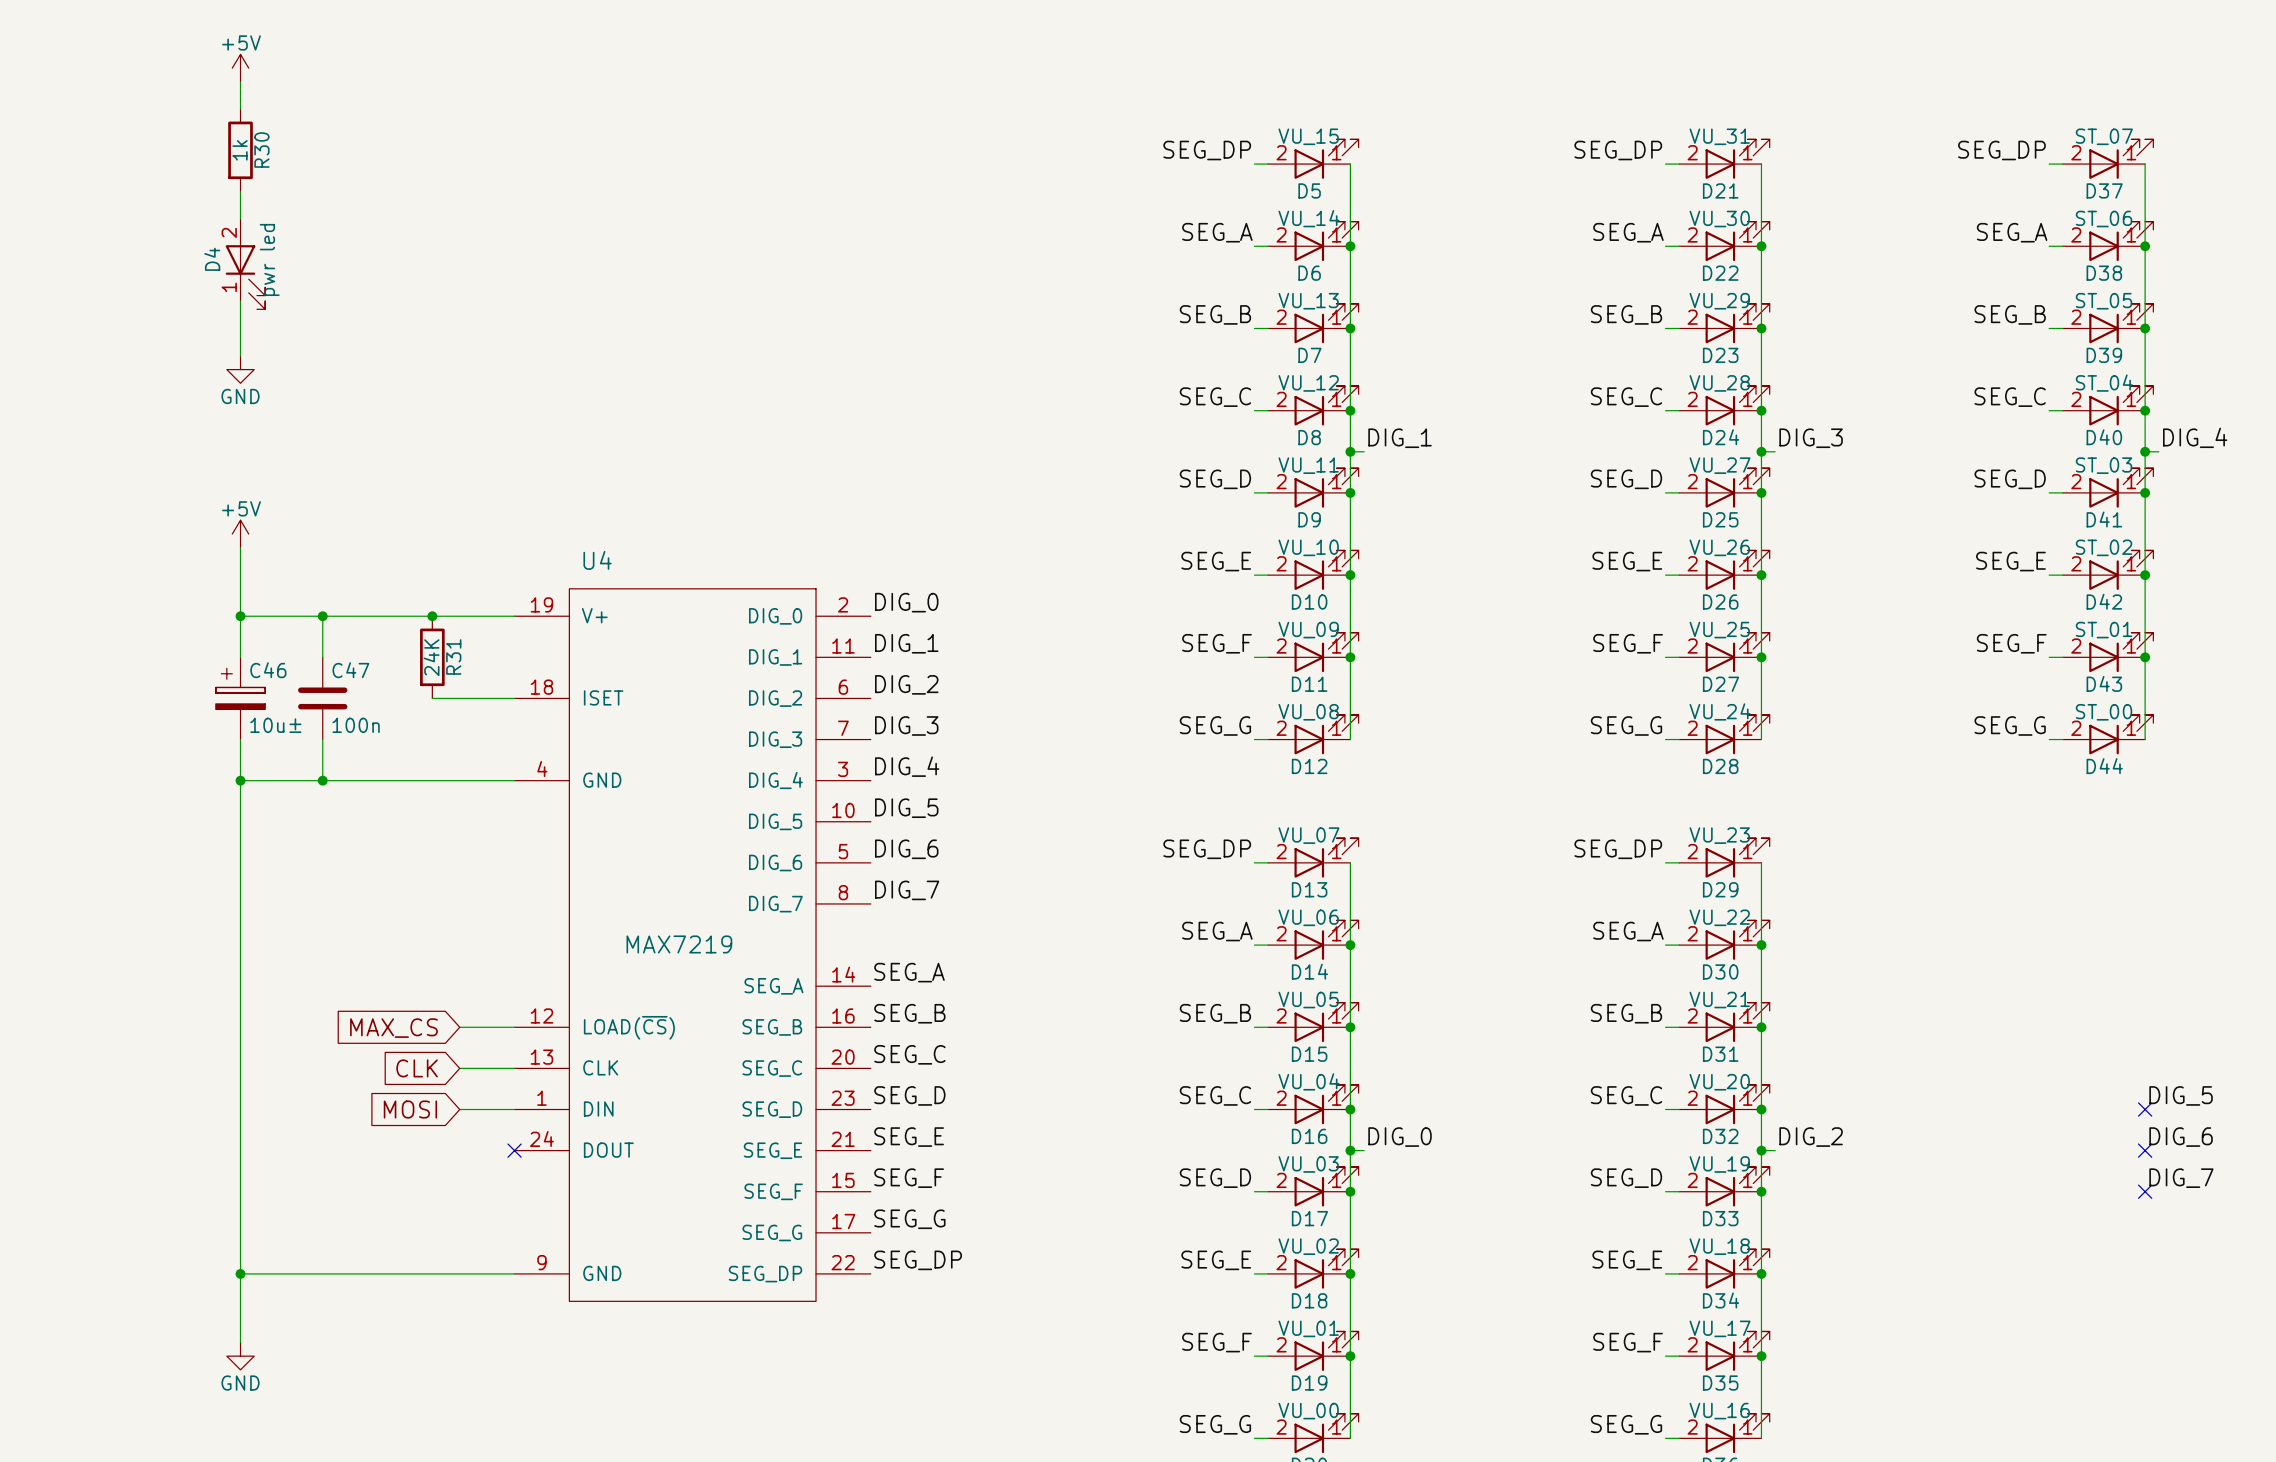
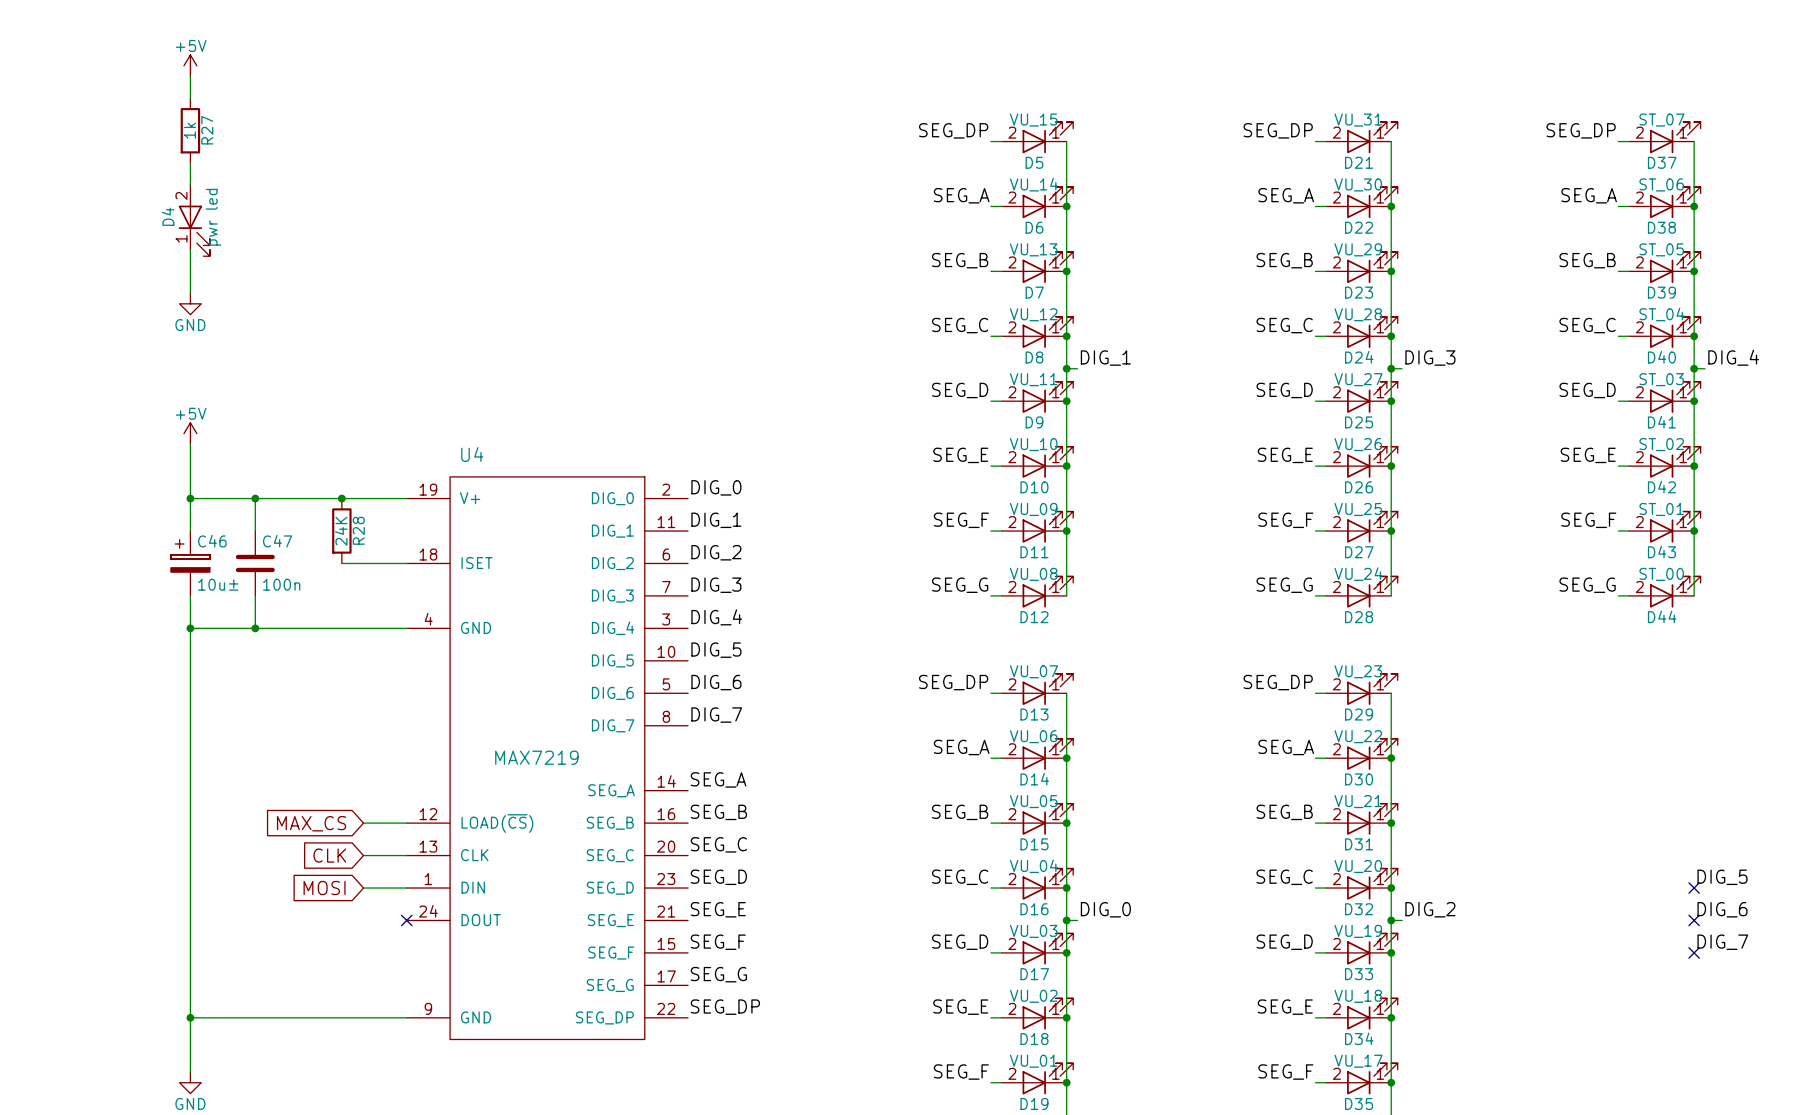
R30 name: R30 (261, 150) -> R27 (207, 130)
R31 name: R31 (453, 657) -> R28 (358, 530)

